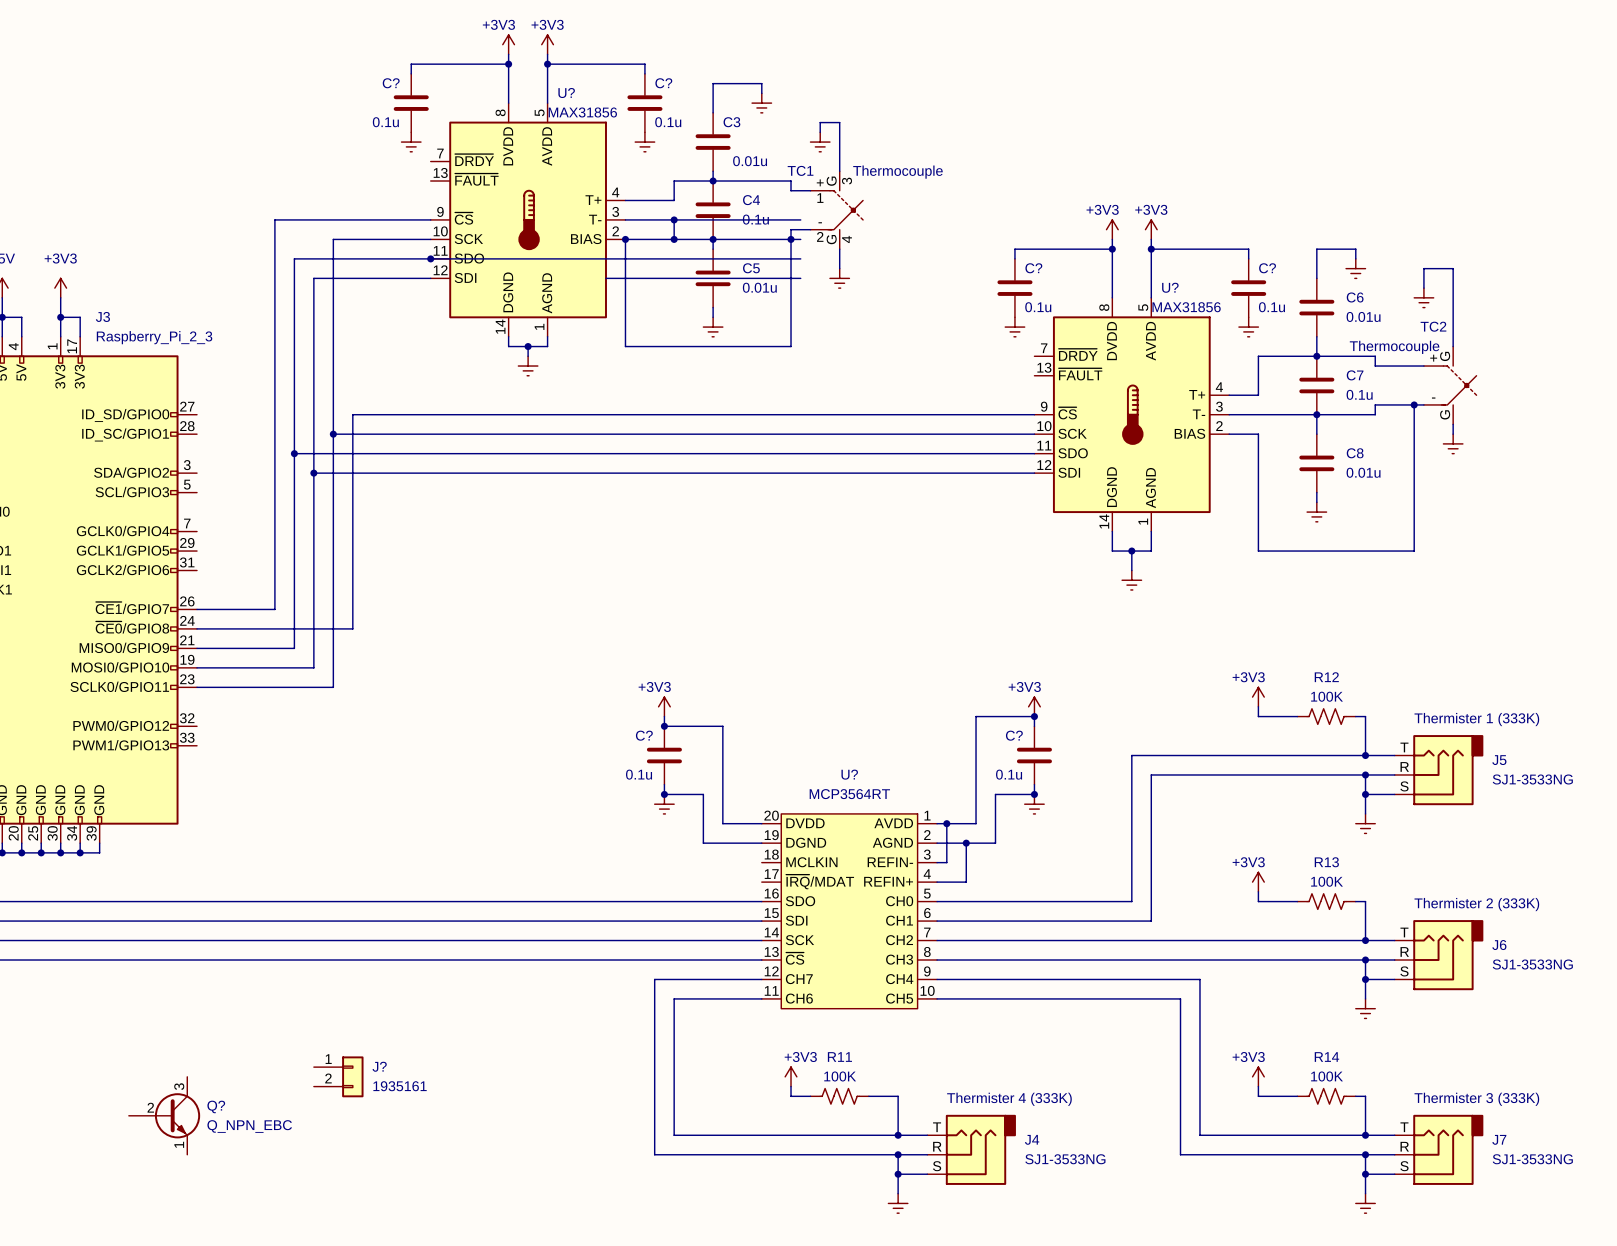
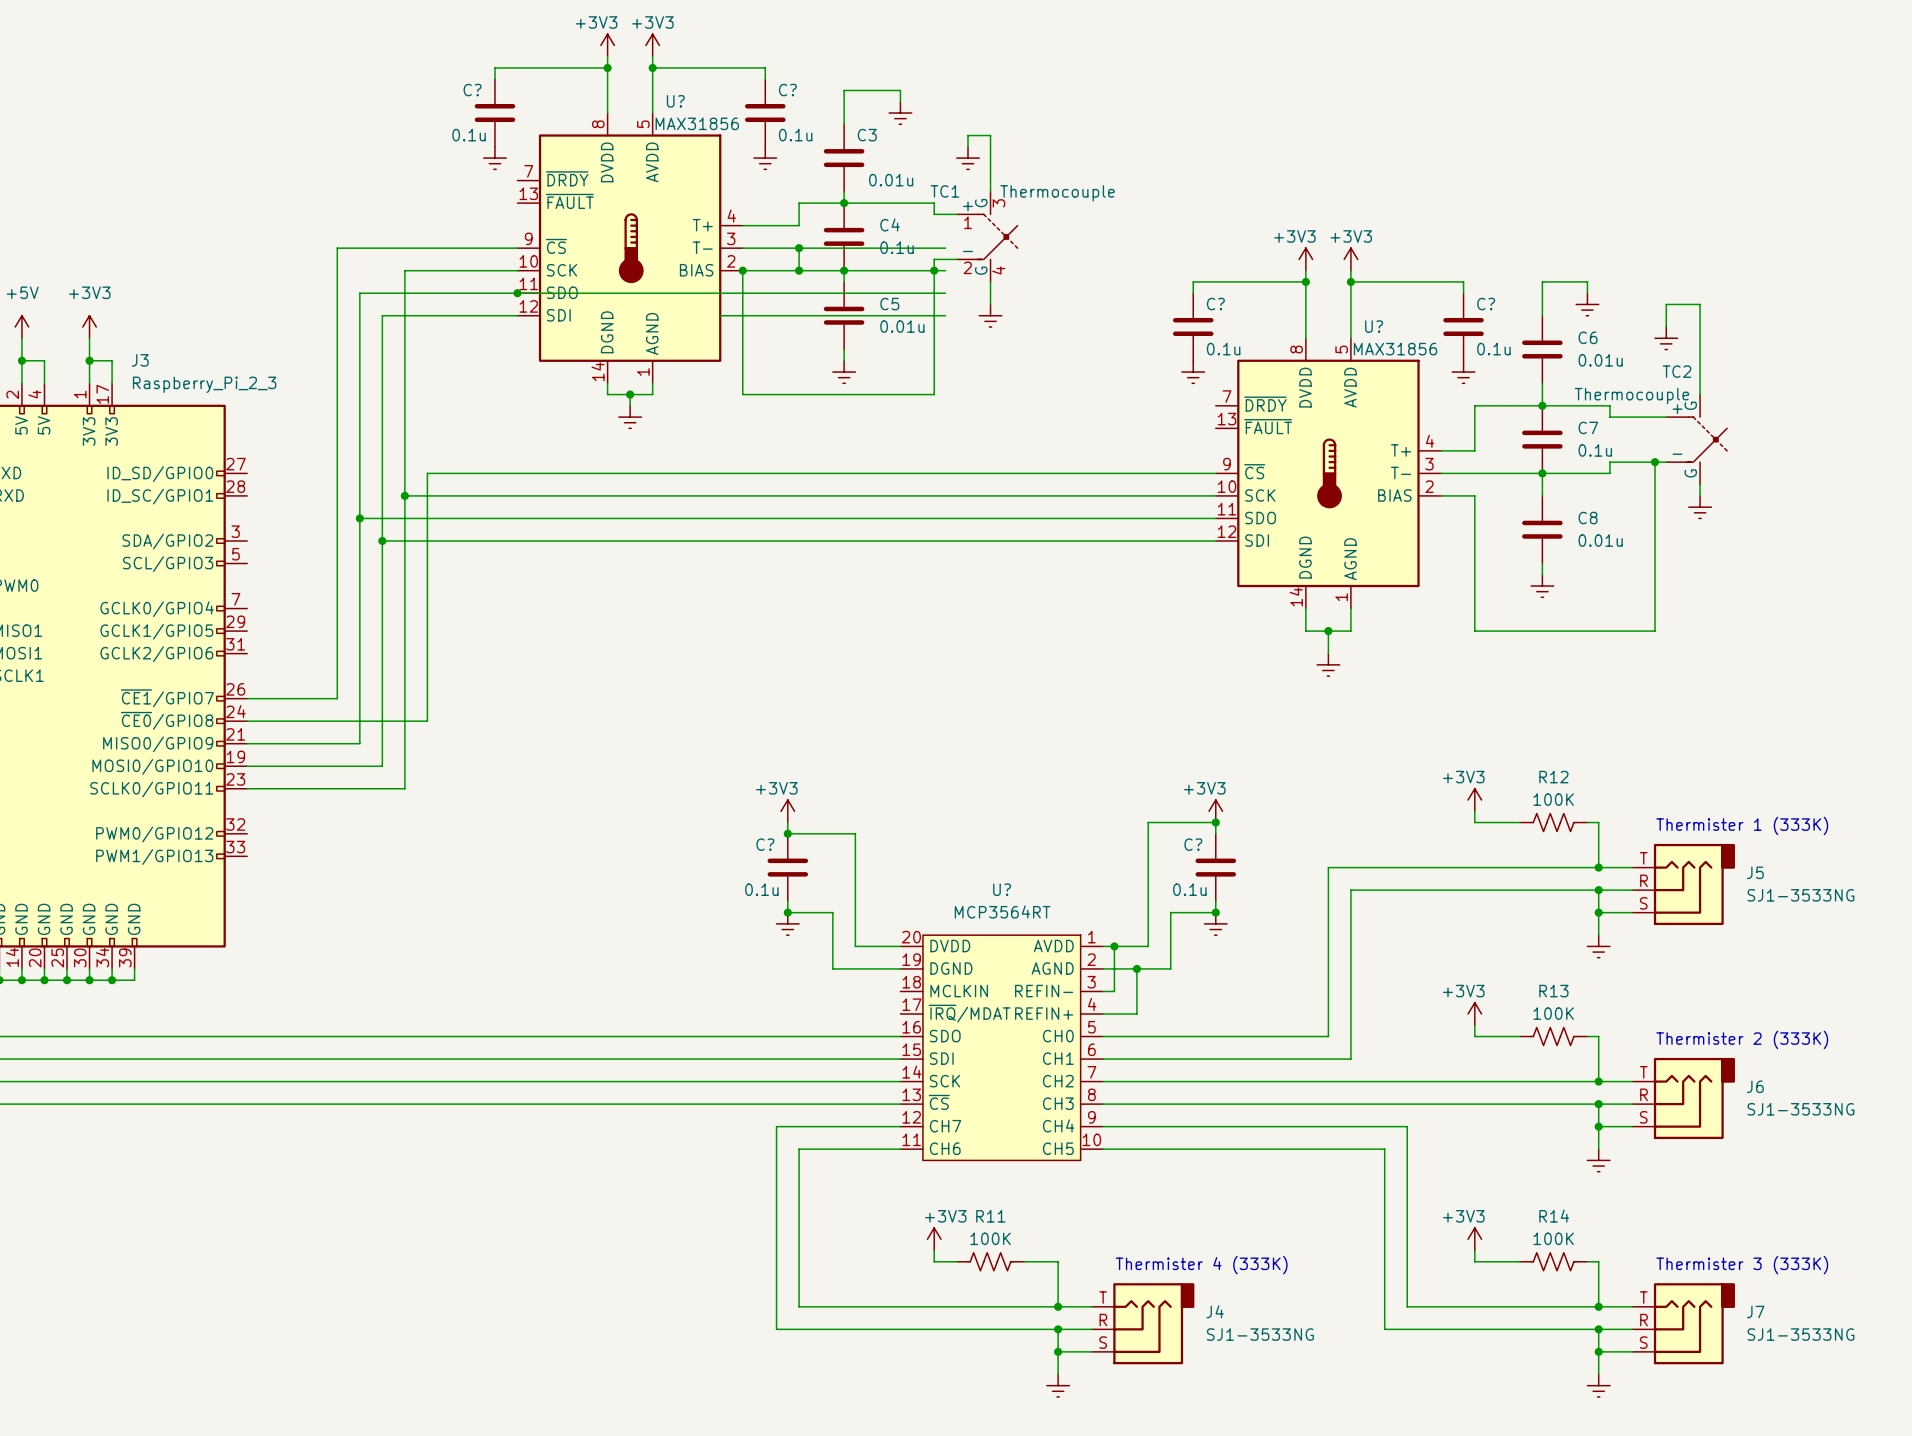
J?: 1935161 (338, 1076) -> none
Q?: Q_NPN_EBC (164, 1115) -> none

